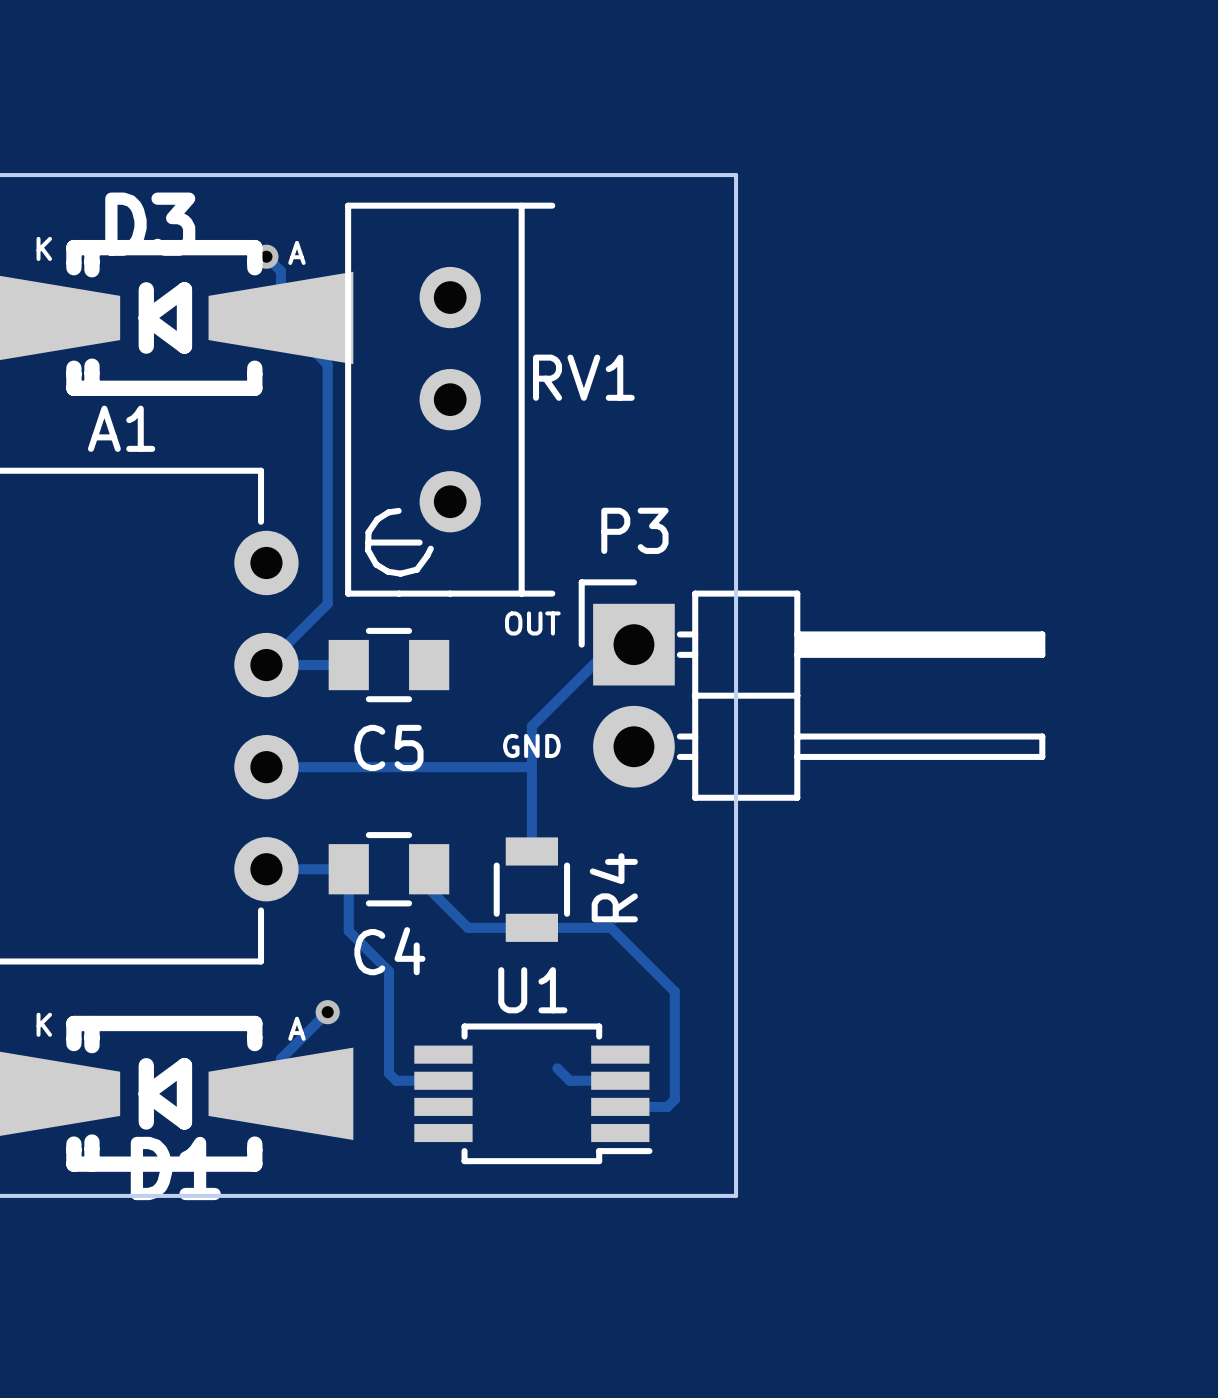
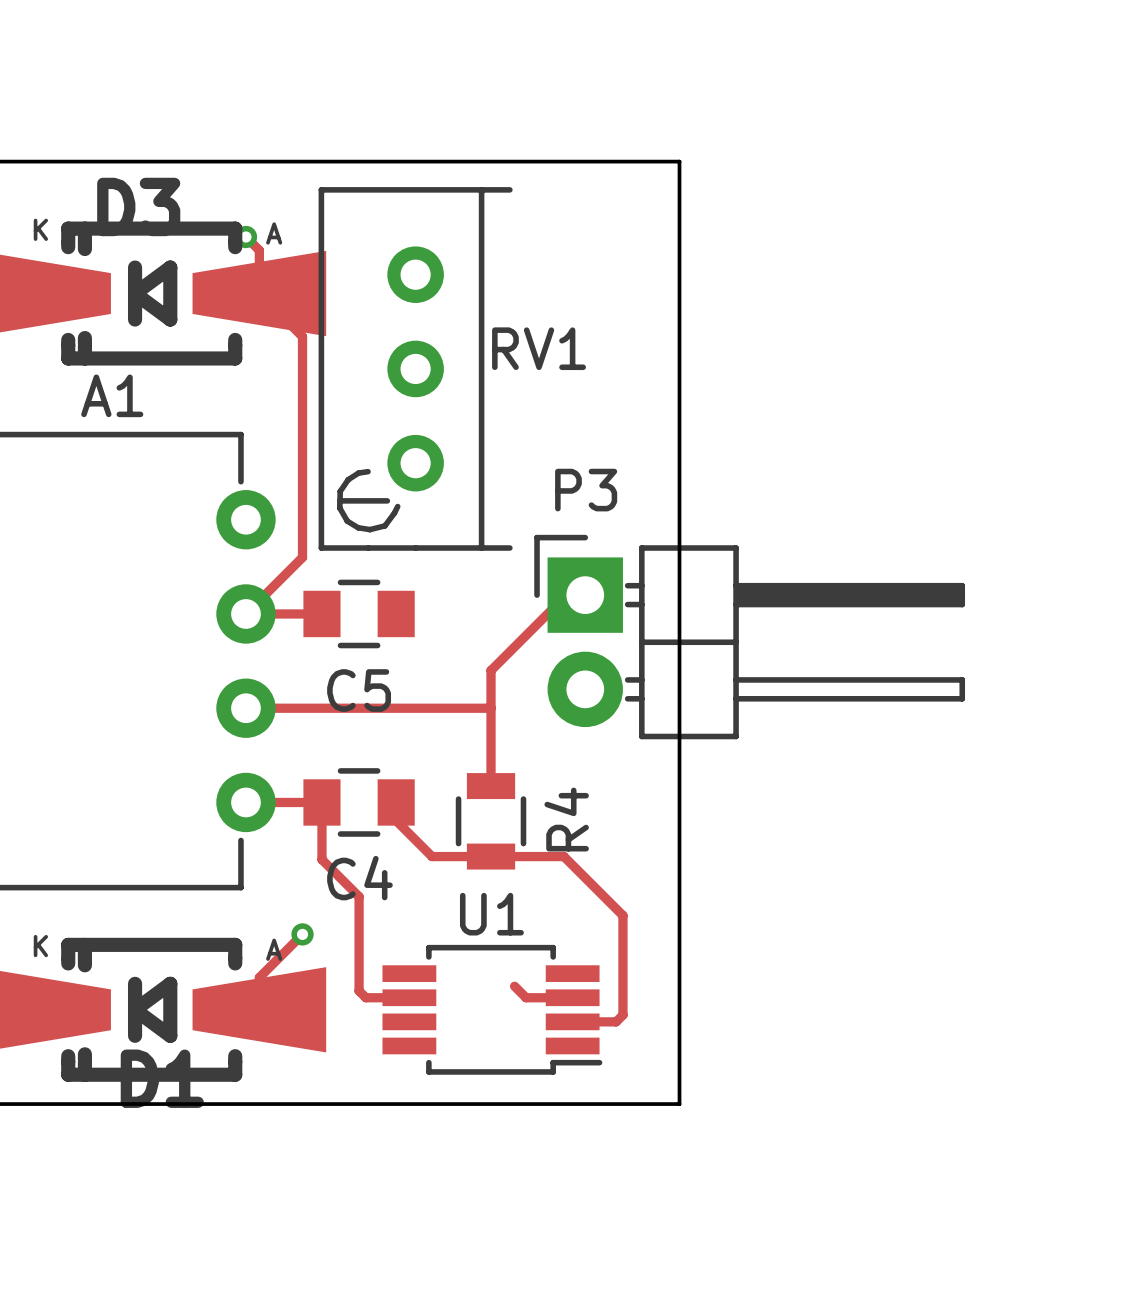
text: OUT (532, 623) -> none
text: GND (531, 745) -> none

